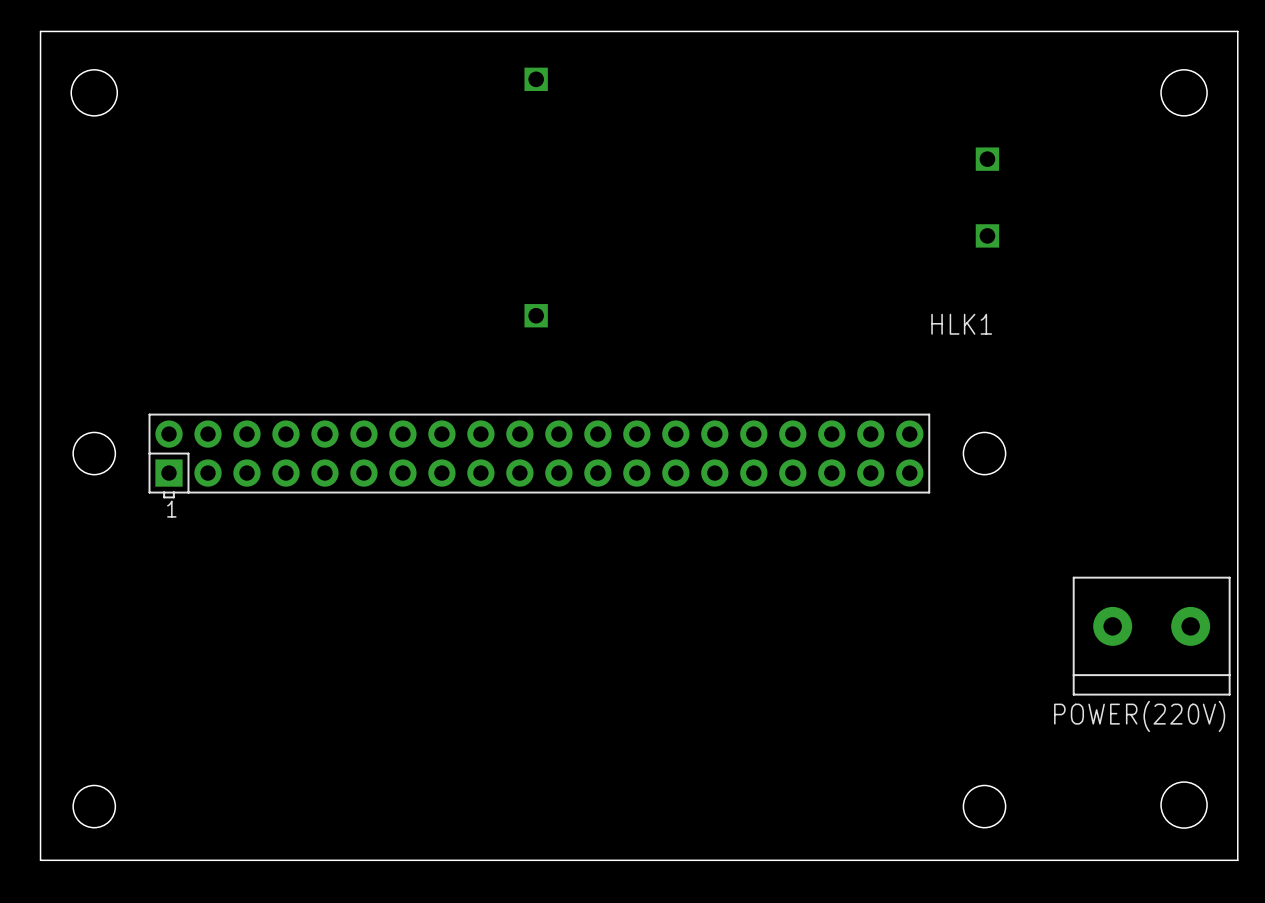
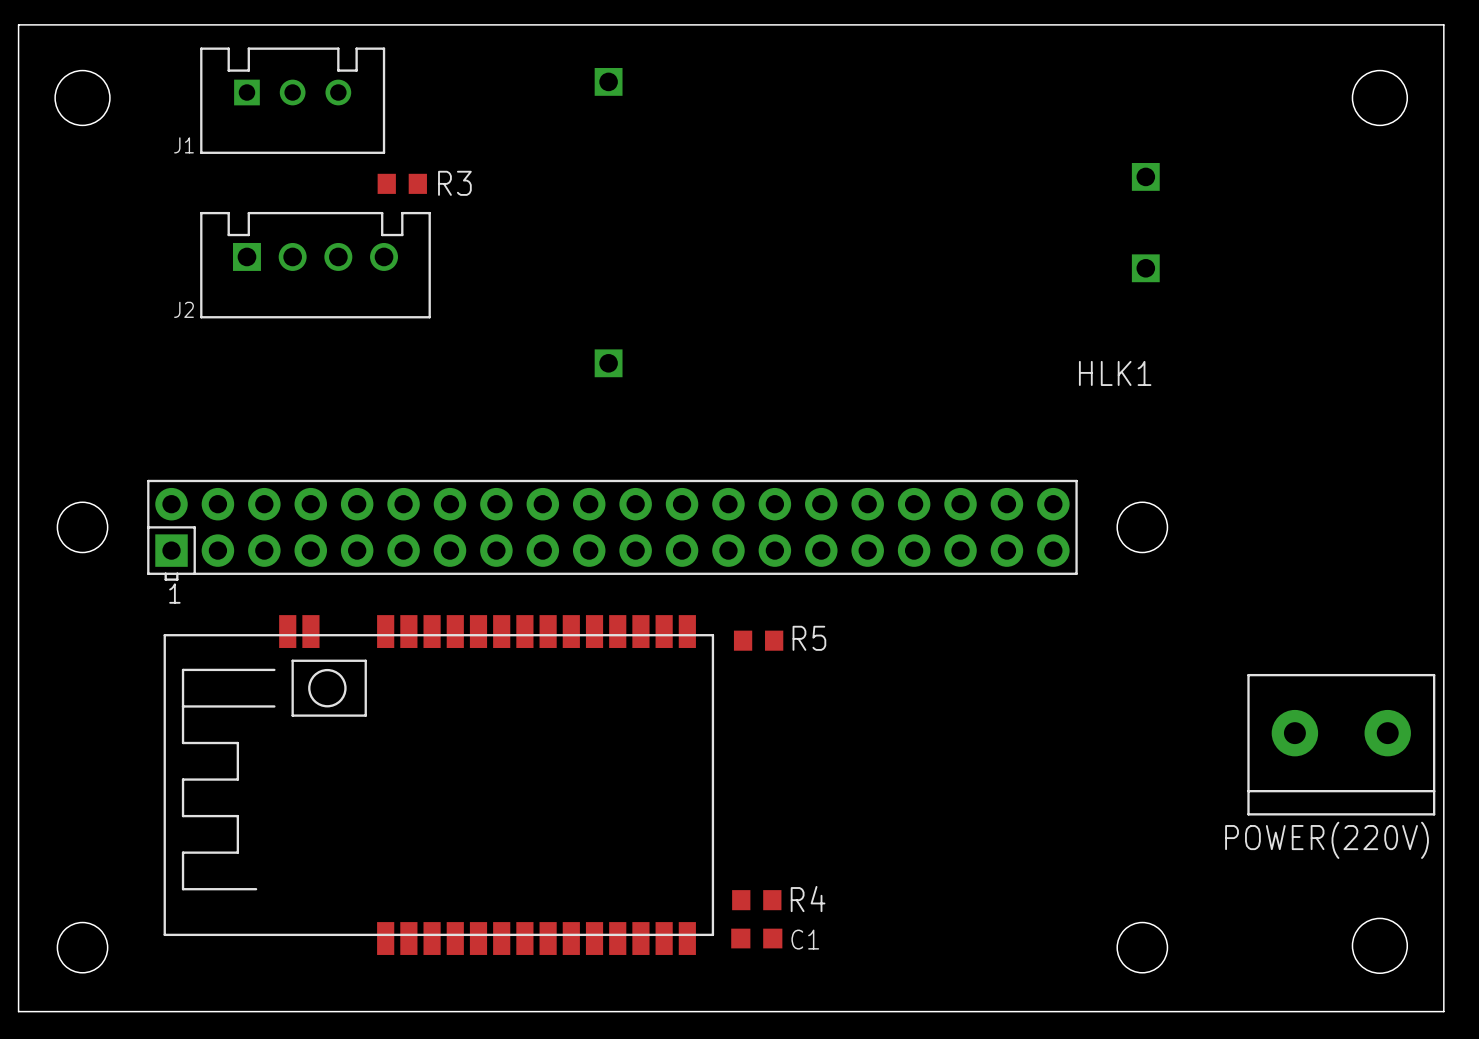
J1: none -> (292, 100)
R3: none -> (402, 183)
J2: none -> (315, 265)
R5: none -> (758, 640)
part: none -> (438, 785)
R4: none -> (756, 900)
C1: none -> (756, 938)

